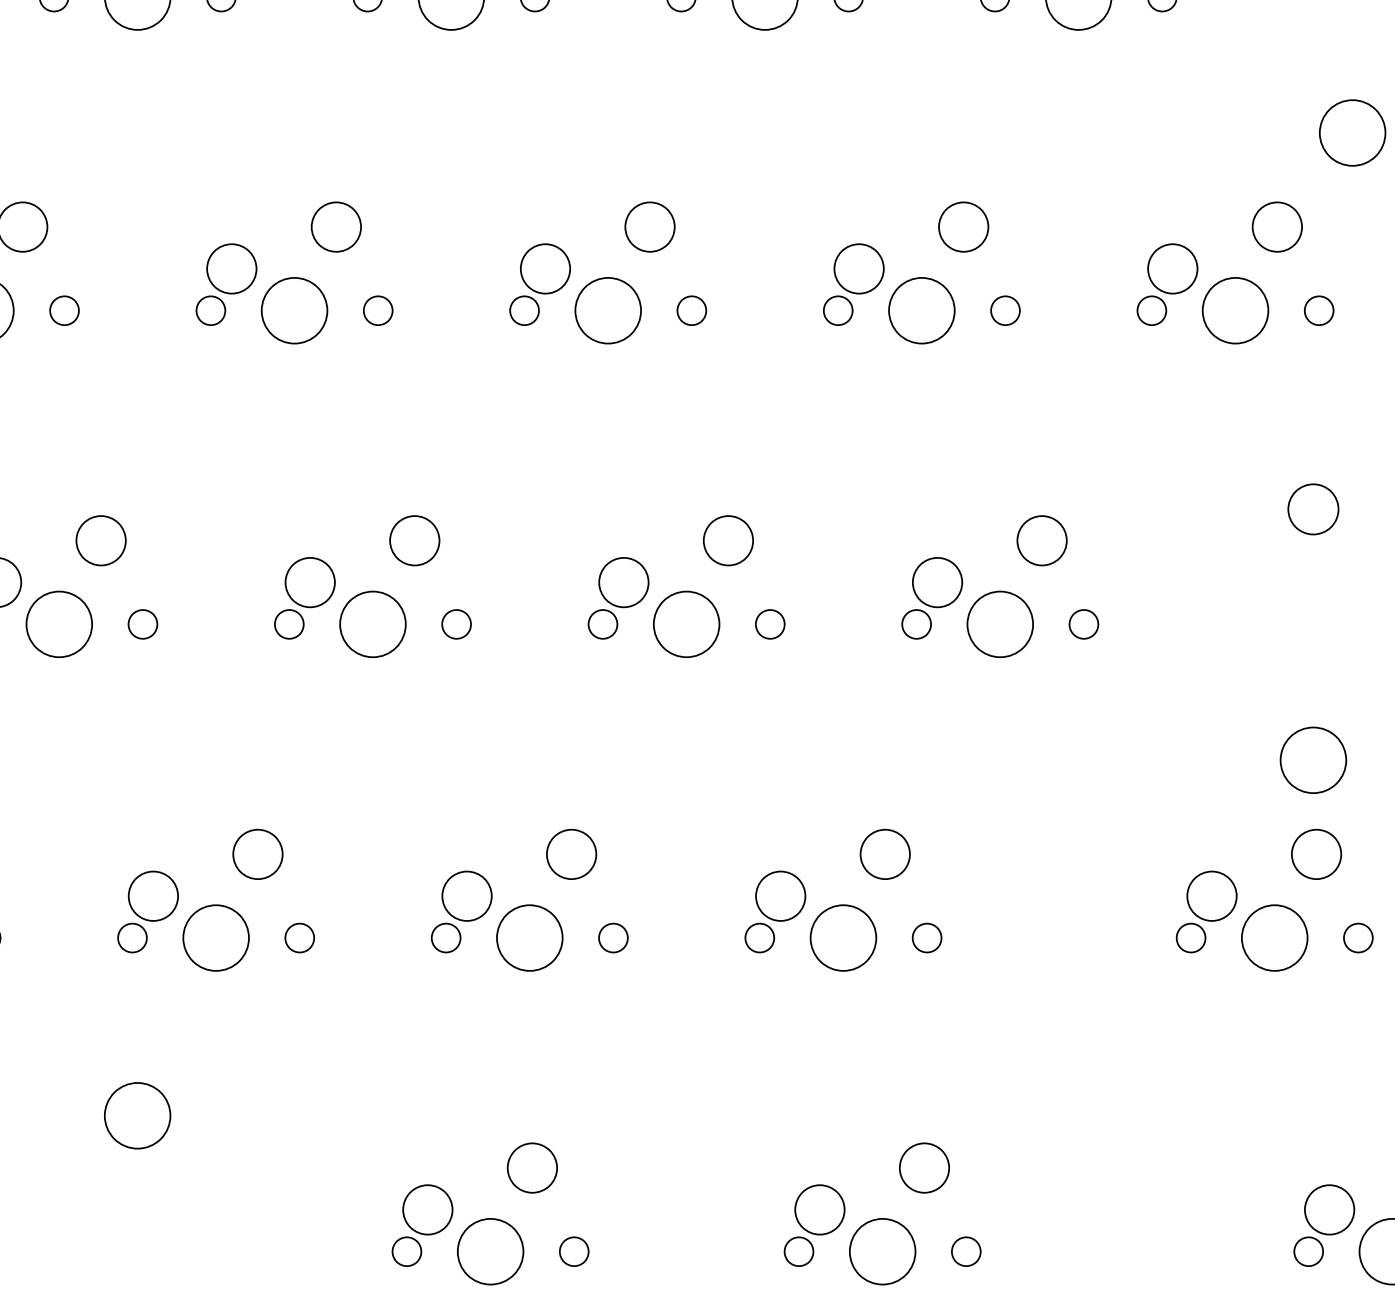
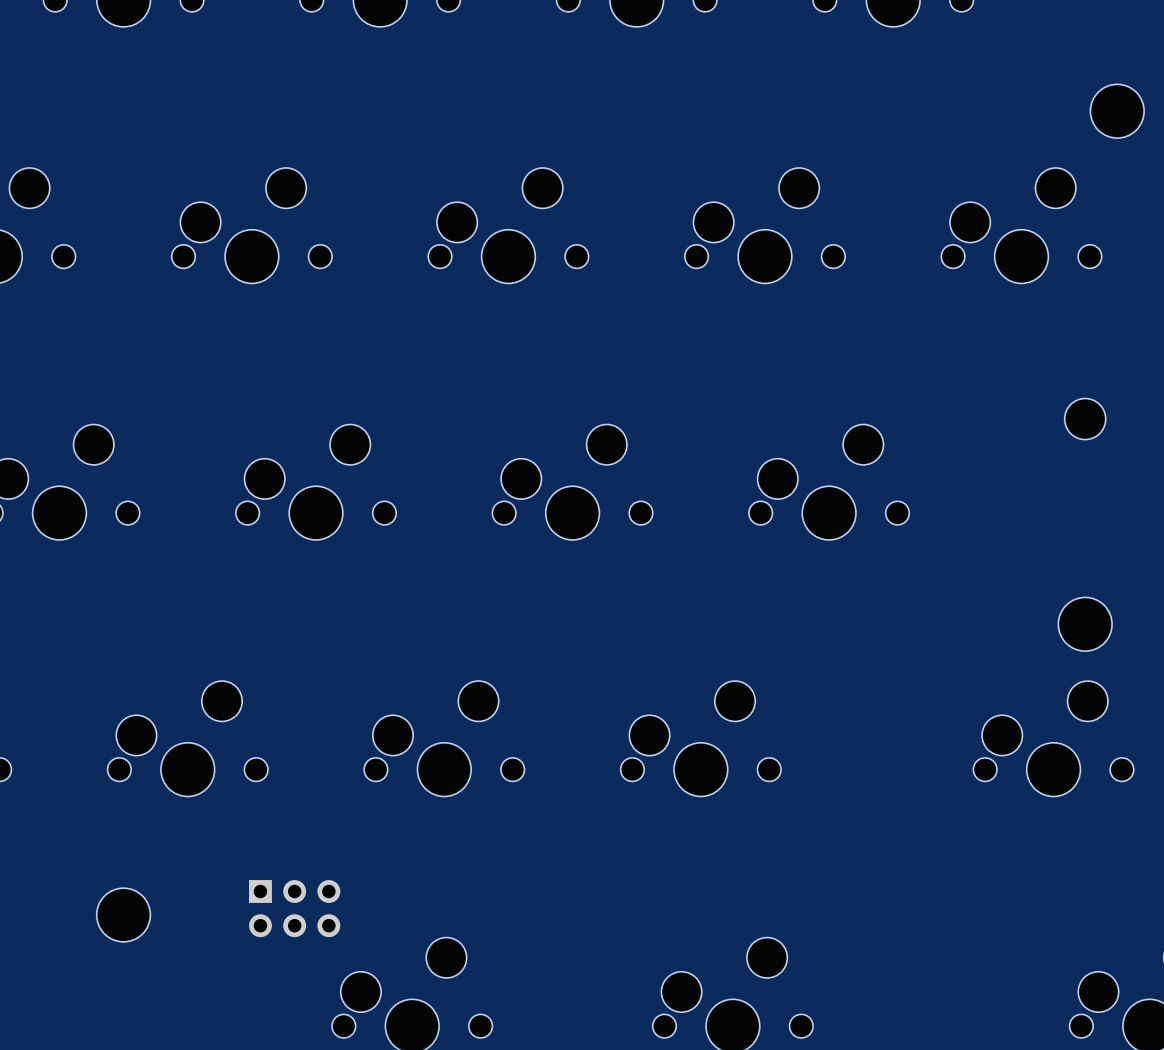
part: none -> (294, 908)

